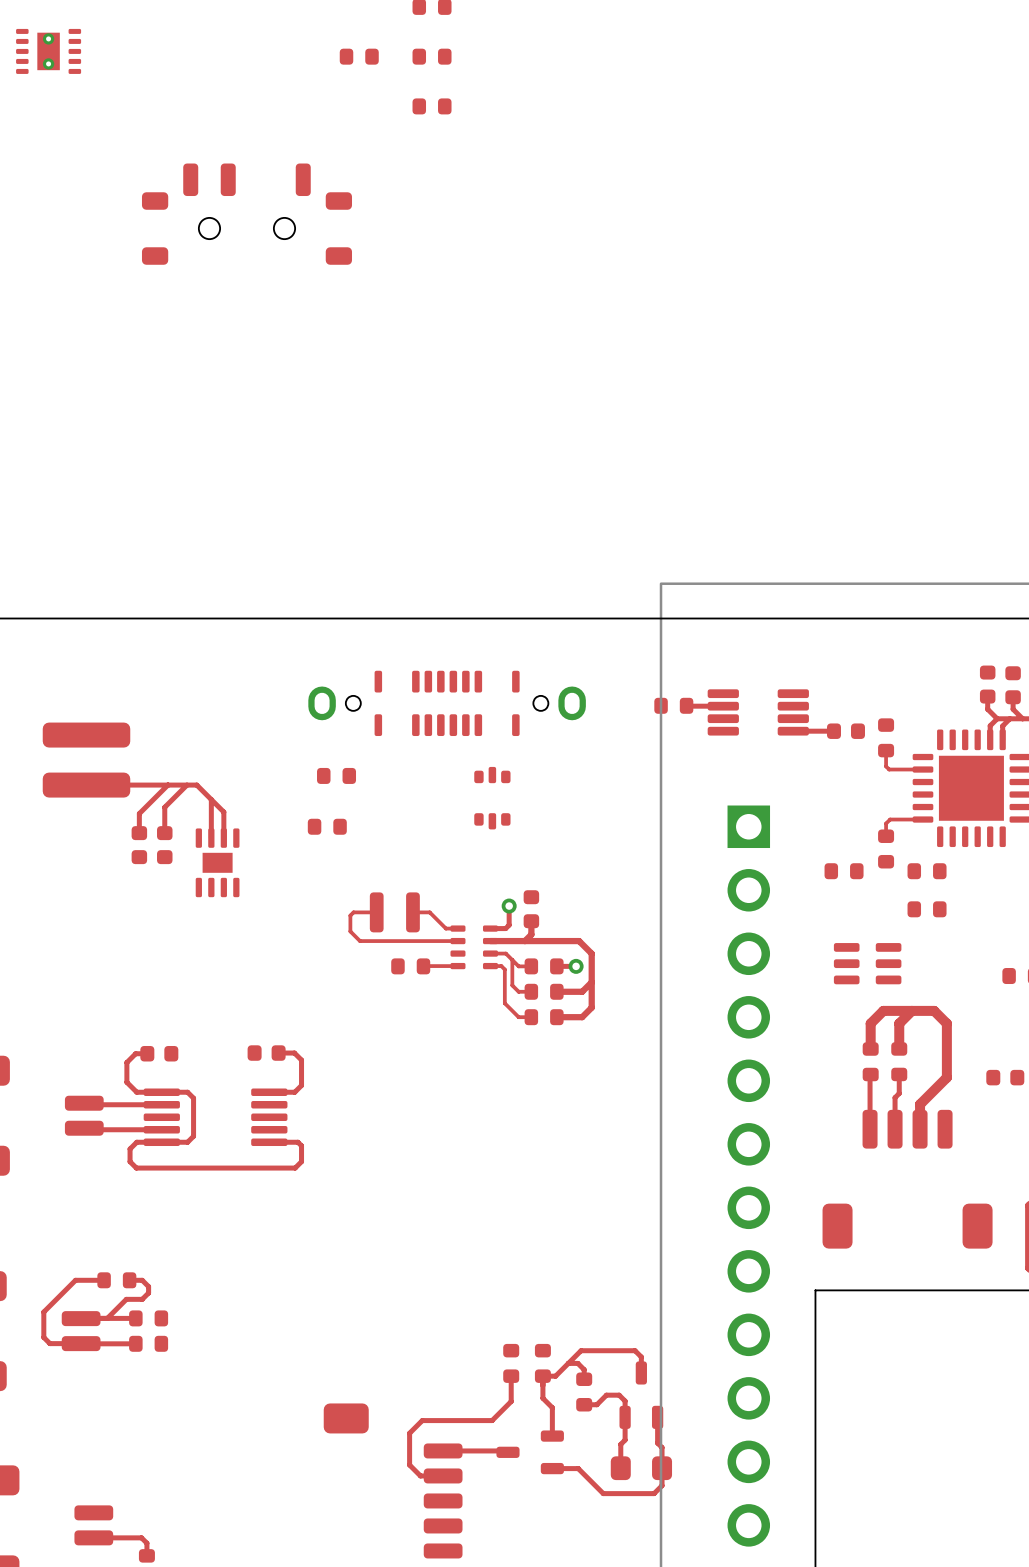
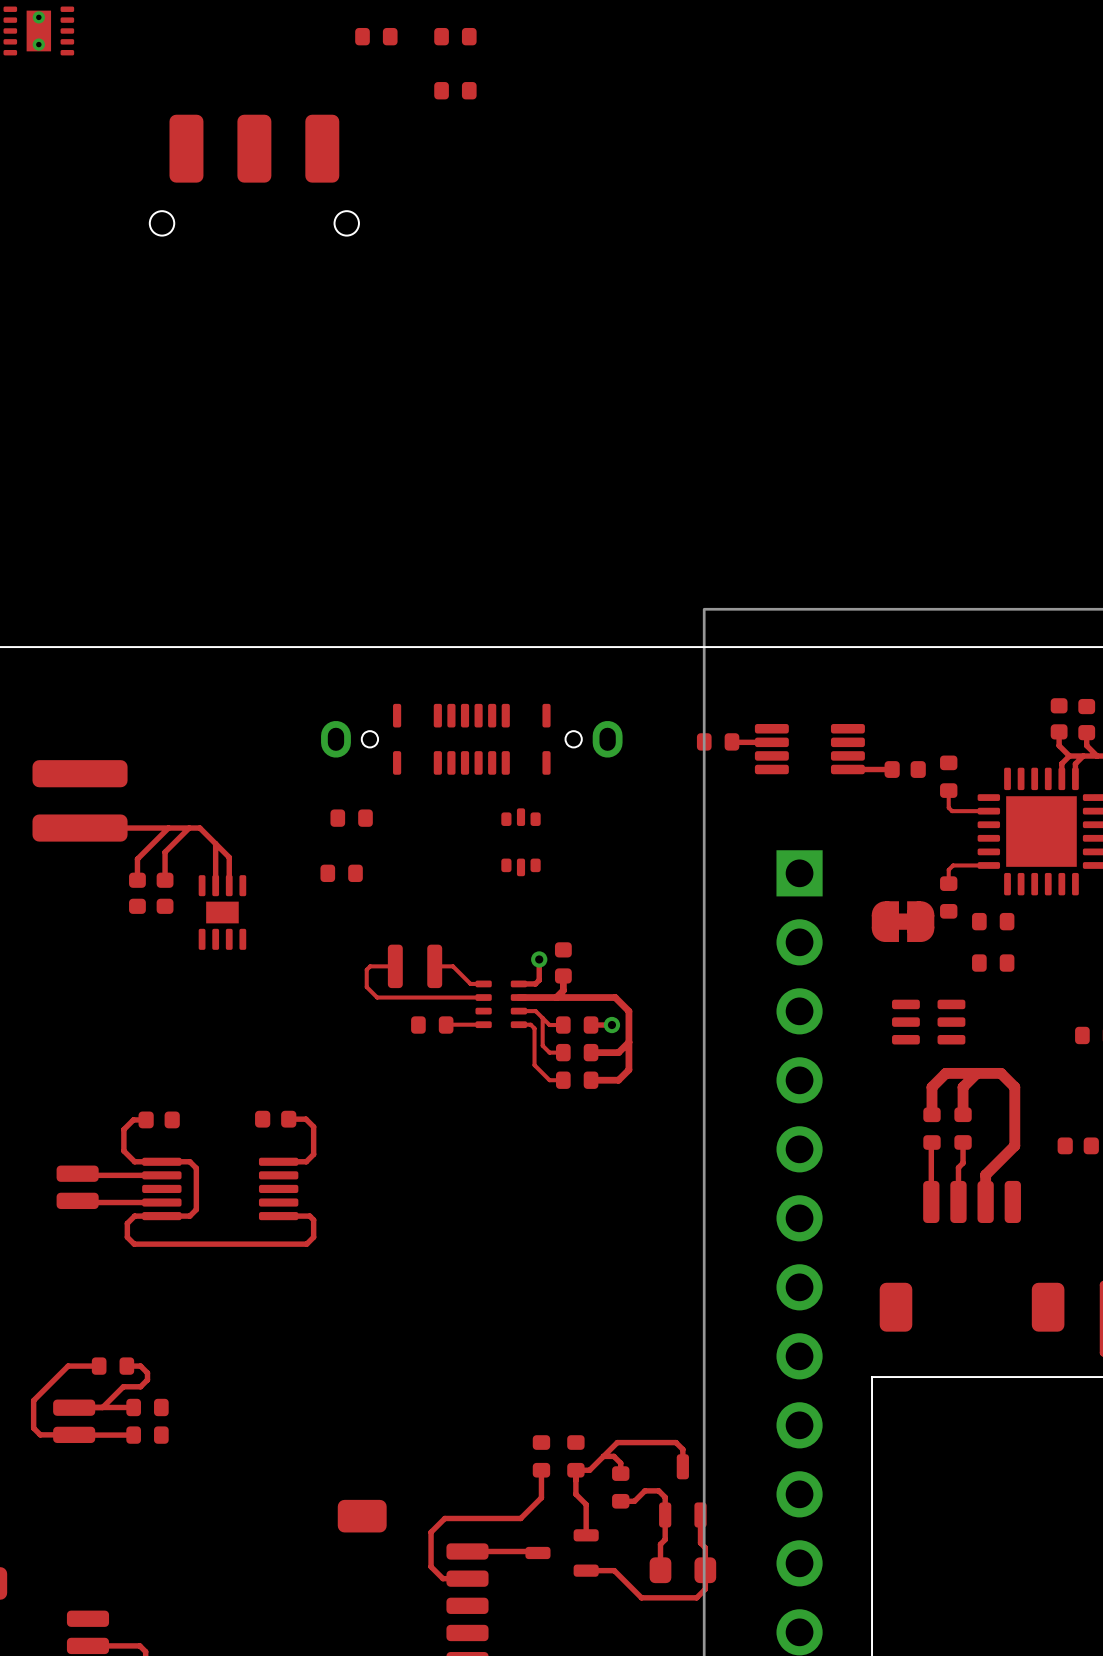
part: none -> (254, 175)
part: (246, 214) -> none
part footprint: [824, 863, 864, 880] -> [871, 901, 935, 943]

